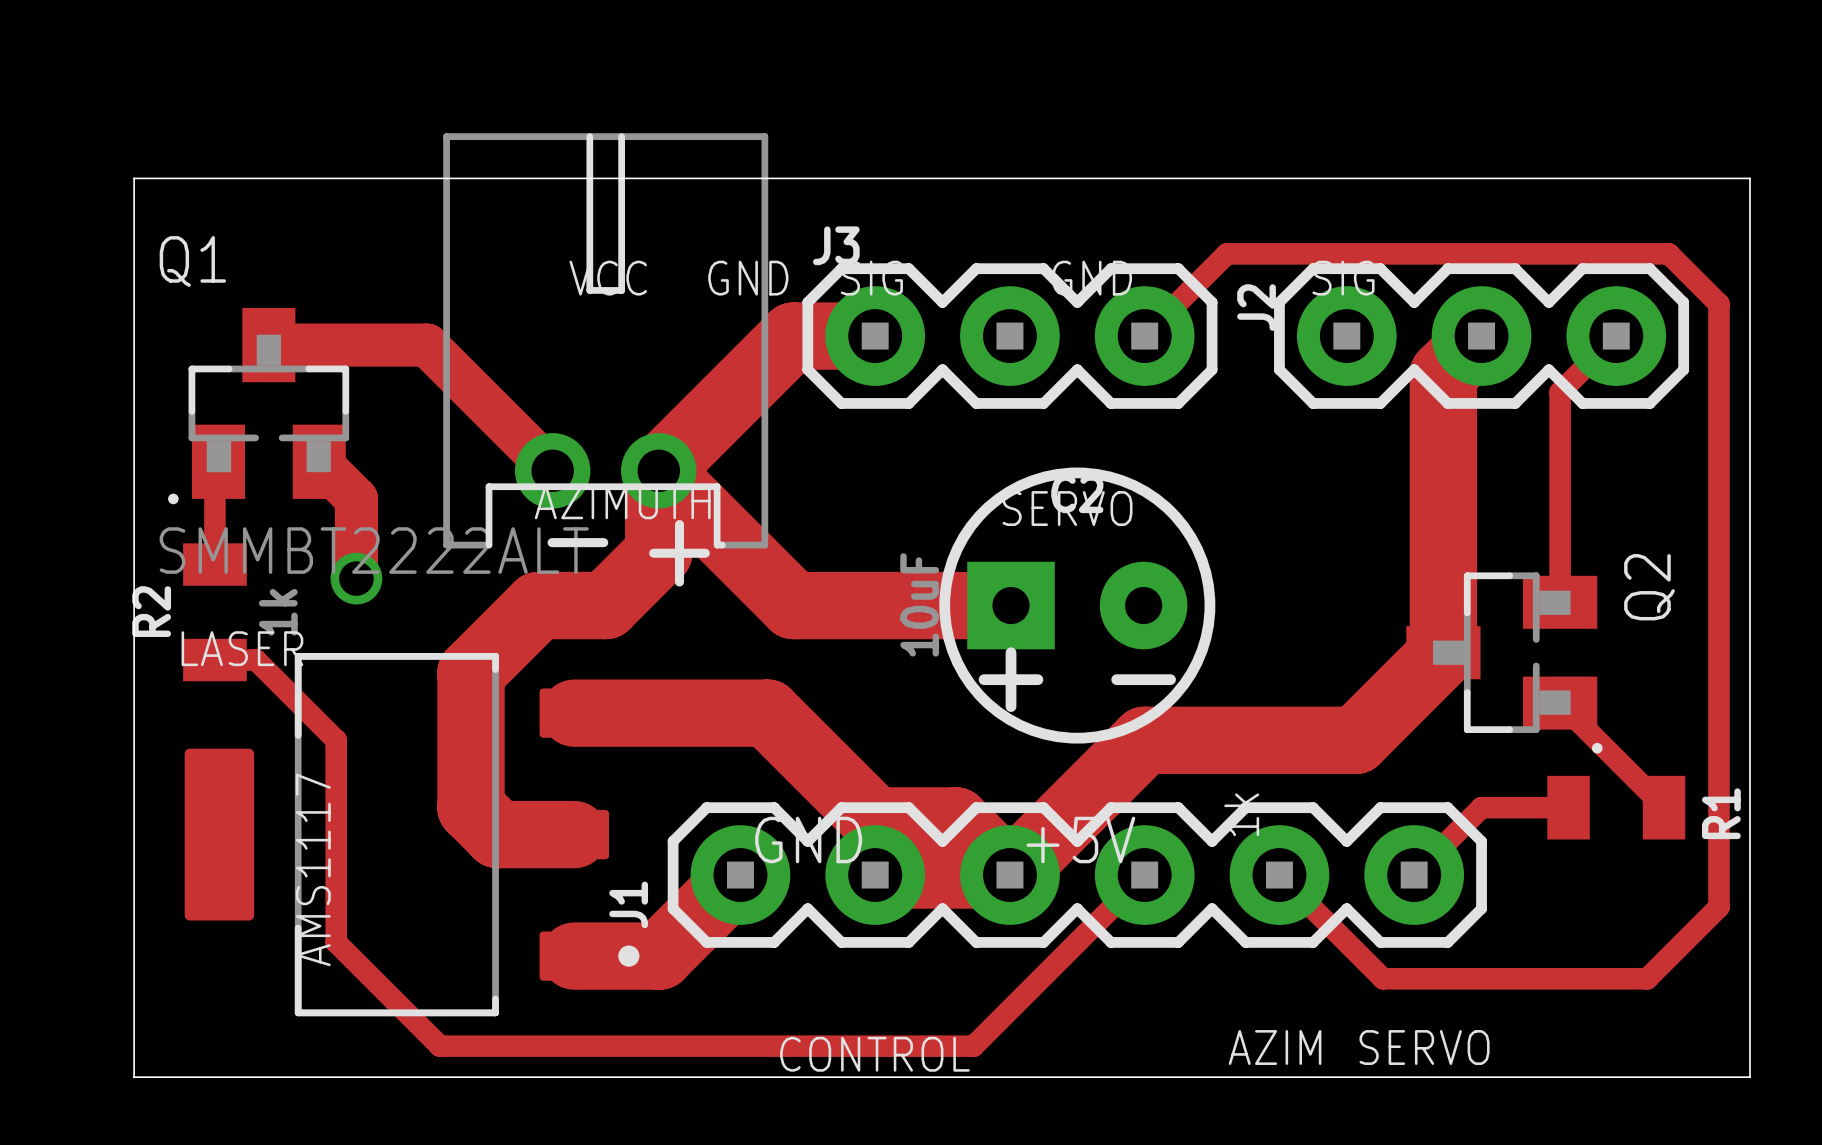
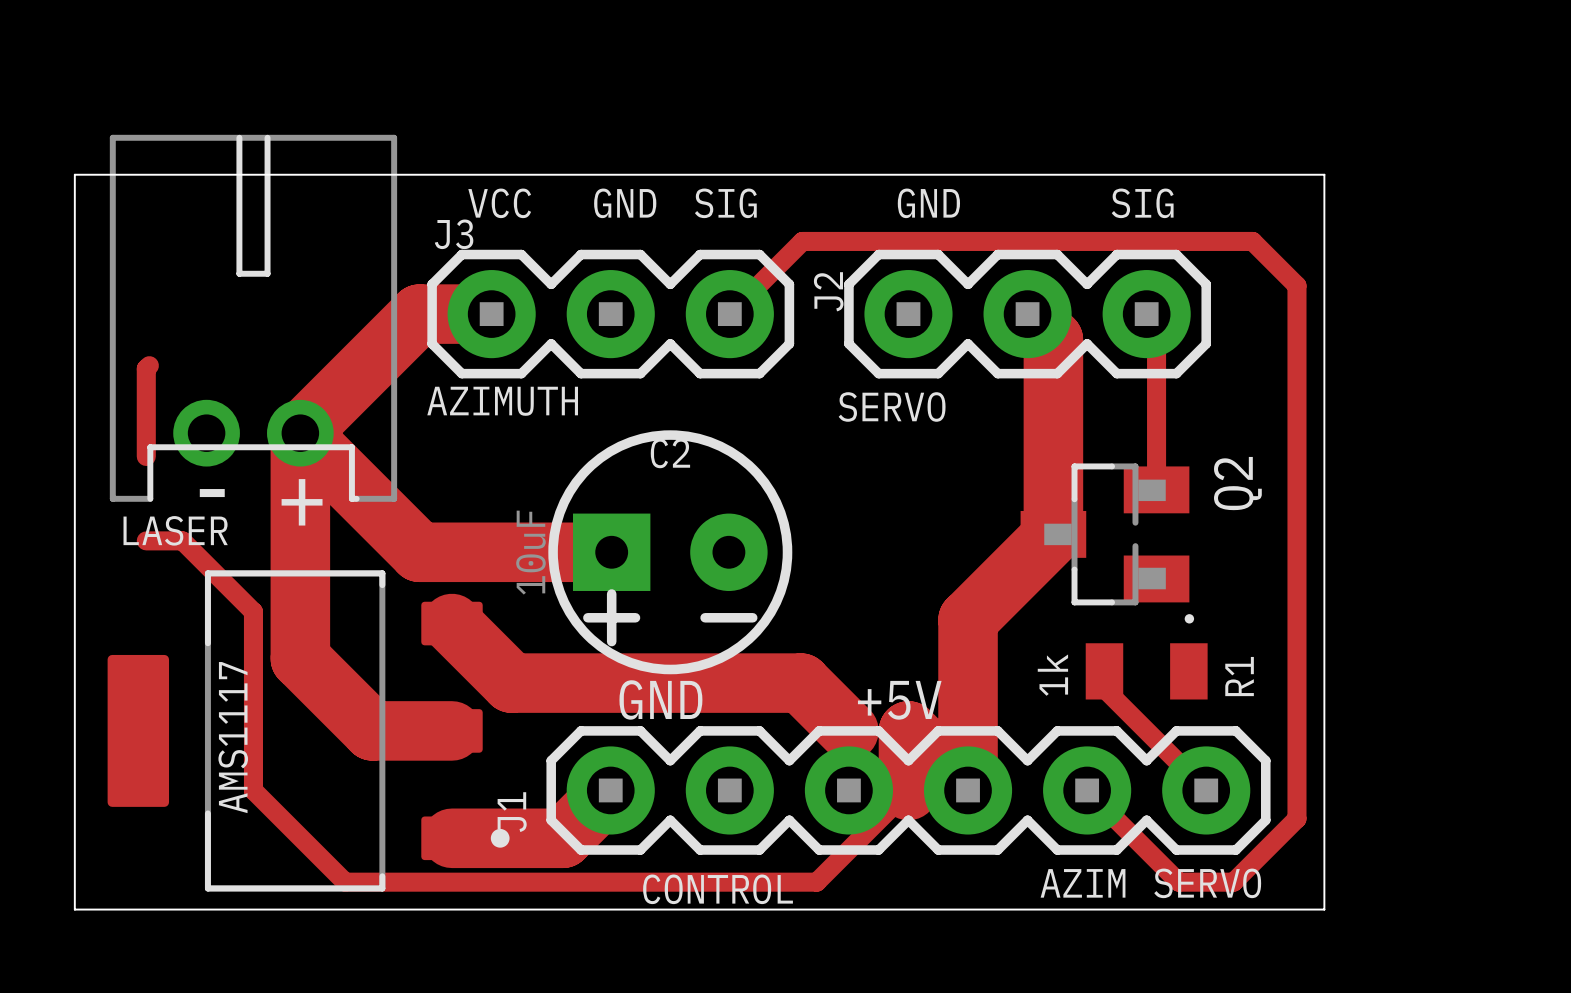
board edge: (134, 245) (134, 178) (1749, 178) (1749, 1077) (1547, 1077) -> (74, 174) (1324, 174) (1324, 909)
top track: (875, 336) (793, 336) (658, 470) -> (491, 314) (419, 314) (300, 433)
J3 position: (1009, 336) -> (610, 314)
top track: (1144, 336) (1226, 253) (1668, 253) (1718, 304) (1718, 907) (1647, 978) (1383, 978) (1279, 875) -> none
top track: (1481, 336) (1443, 374) (1443, 652) (1355, 740) (1144, 740) (1009, 875) (875, 875) -> none
J2 position: (1481, 336) -> (1027, 314)
top track: (1616, 336) (1560, 392) (1560, 602) -> none
part position: (605, 340) -> (253, 318)
top track: (268, 345) (426, 345) (552, 470) -> none
top track: none -> (729, 314) (802, 241) (1252, 241) (1296, 285) (1296, 818) (1233, 882) (1178, 882) (1087, 790)
top track: none -> (1027, 314) (1053, 339) (1053, 534) (968, 619) (968, 790) (908, 730) (908, 790)
top track: none -> (1146, 314) (1156, 323) (1156, 489)
Q1: SMMBT2222ALT (258, 406) -> none
top track: (319, 461) (356, 498) (356, 578) -> none
top track: (658, 470) (793, 605) (1011, 605) -> (300, 433) (419, 552) (611, 552)
top track: (658, 470) (658, 552) (605, 605) (538, 605) (470, 672) (470, 807) (497, 834) (574, 834) -> none
top track: none -> (300, 433) (300, 658) (372, 730) (451, 730)
via: (356, 578) -> none
C2 position: (1077, 605) -> (670, 552)
R2: 1k (214, 612) -> none
Q2 position: (1504, 662) -> (1107, 543)
top track: (1560, 703) (1664, 807) -> none
top track: (574, 713) (767, 713) (875, 820) -> (451, 623) (511, 683) (729, 683)
top track: none -> (1104, 671) (1104, 688) (1206, 790)
top track: (1568, 807) (1481, 807) (1414, 875) -> none
R1 position: (1616, 807) -> (1146, 671)
part position: (412, 834) -> (308, 730)
top track: (740, 875) (659, 956) (574, 956) -> none
J1 position: (1077, 875) -> (908, 790)
top track: none -> (610, 790) (562, 838) (451, 838)

